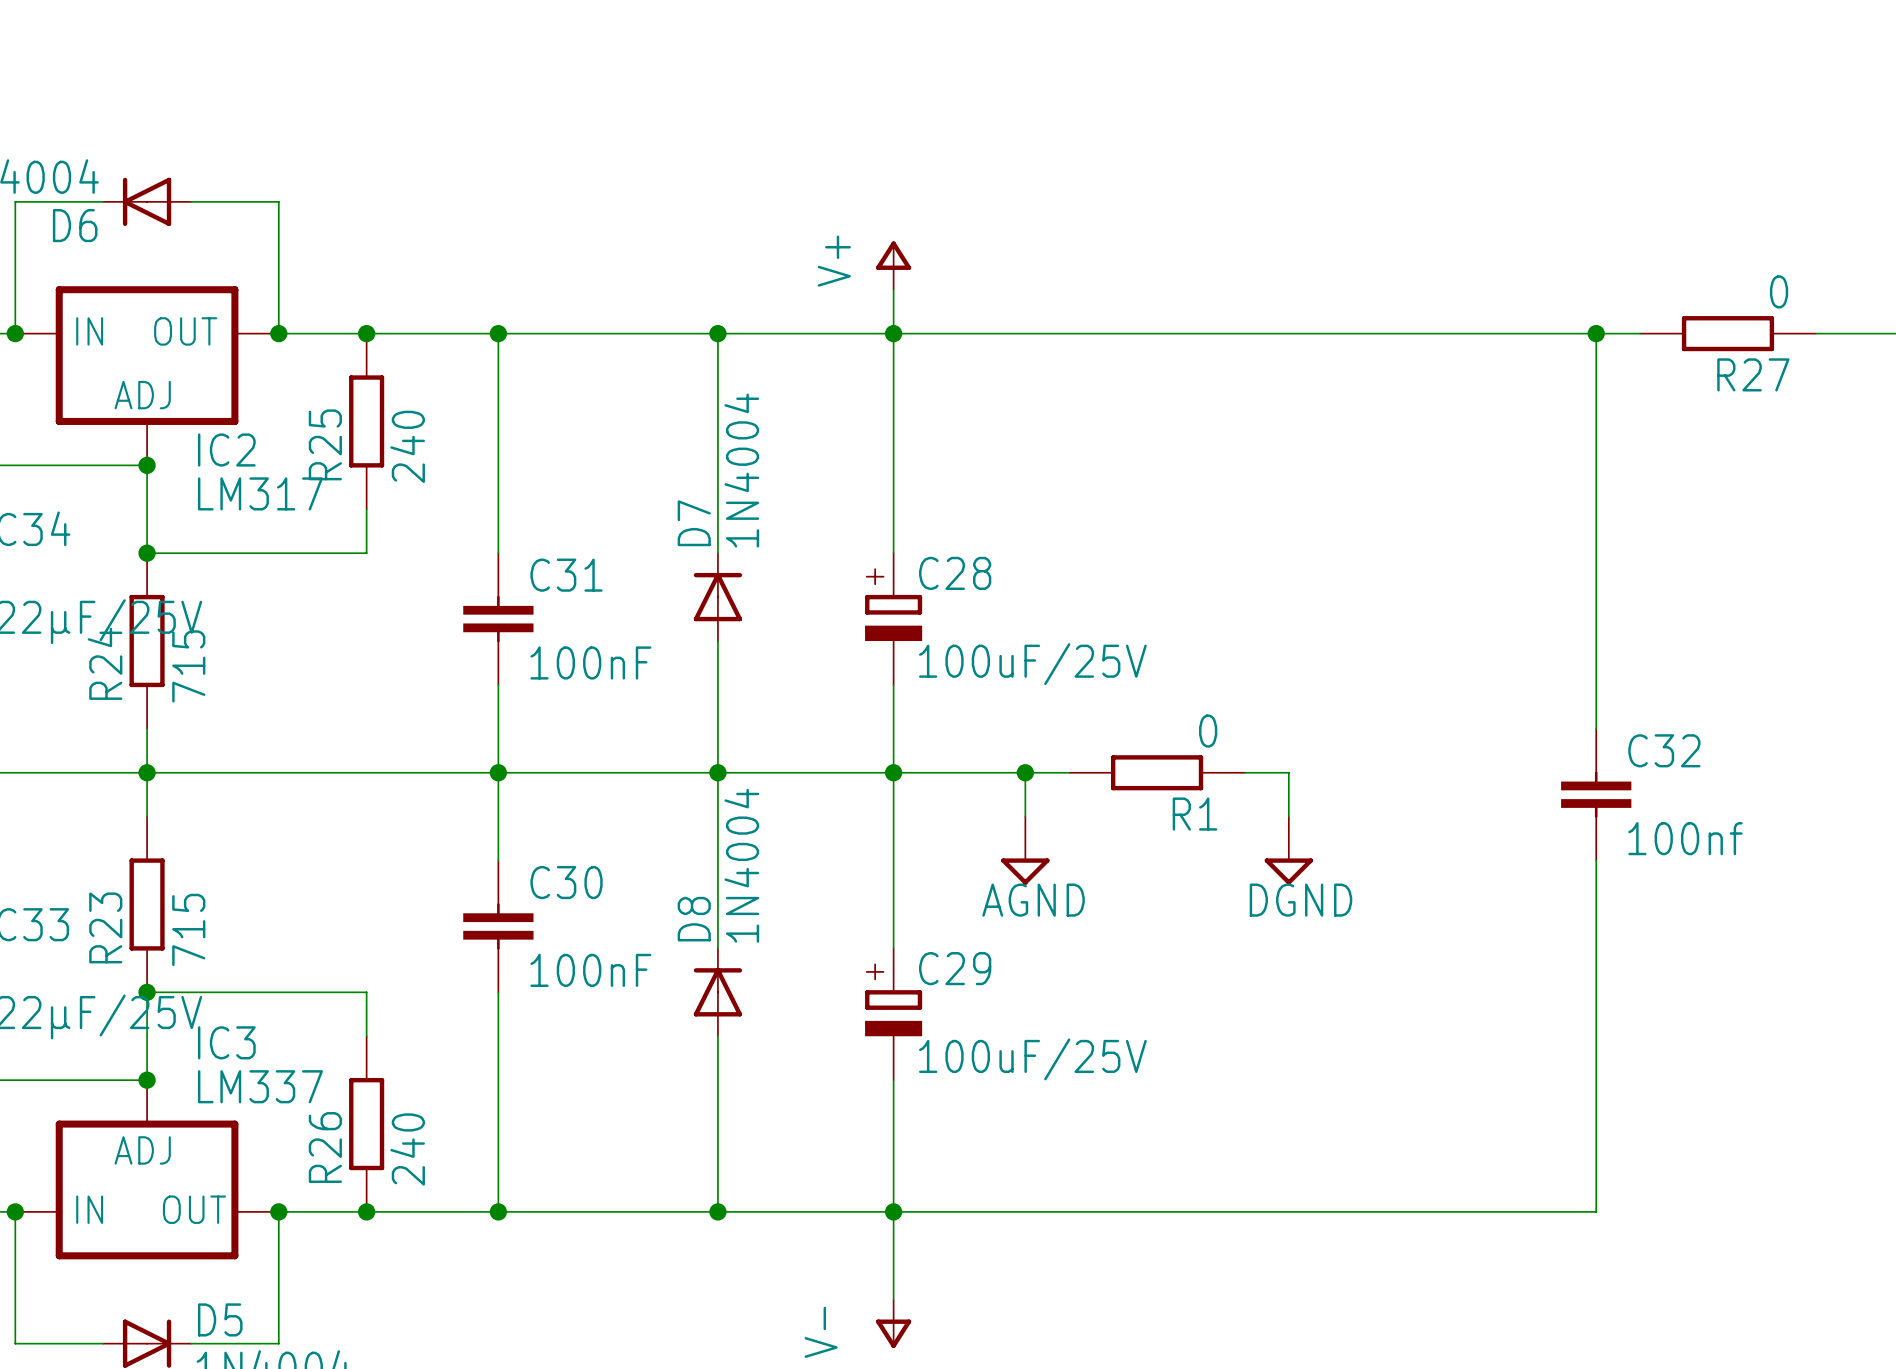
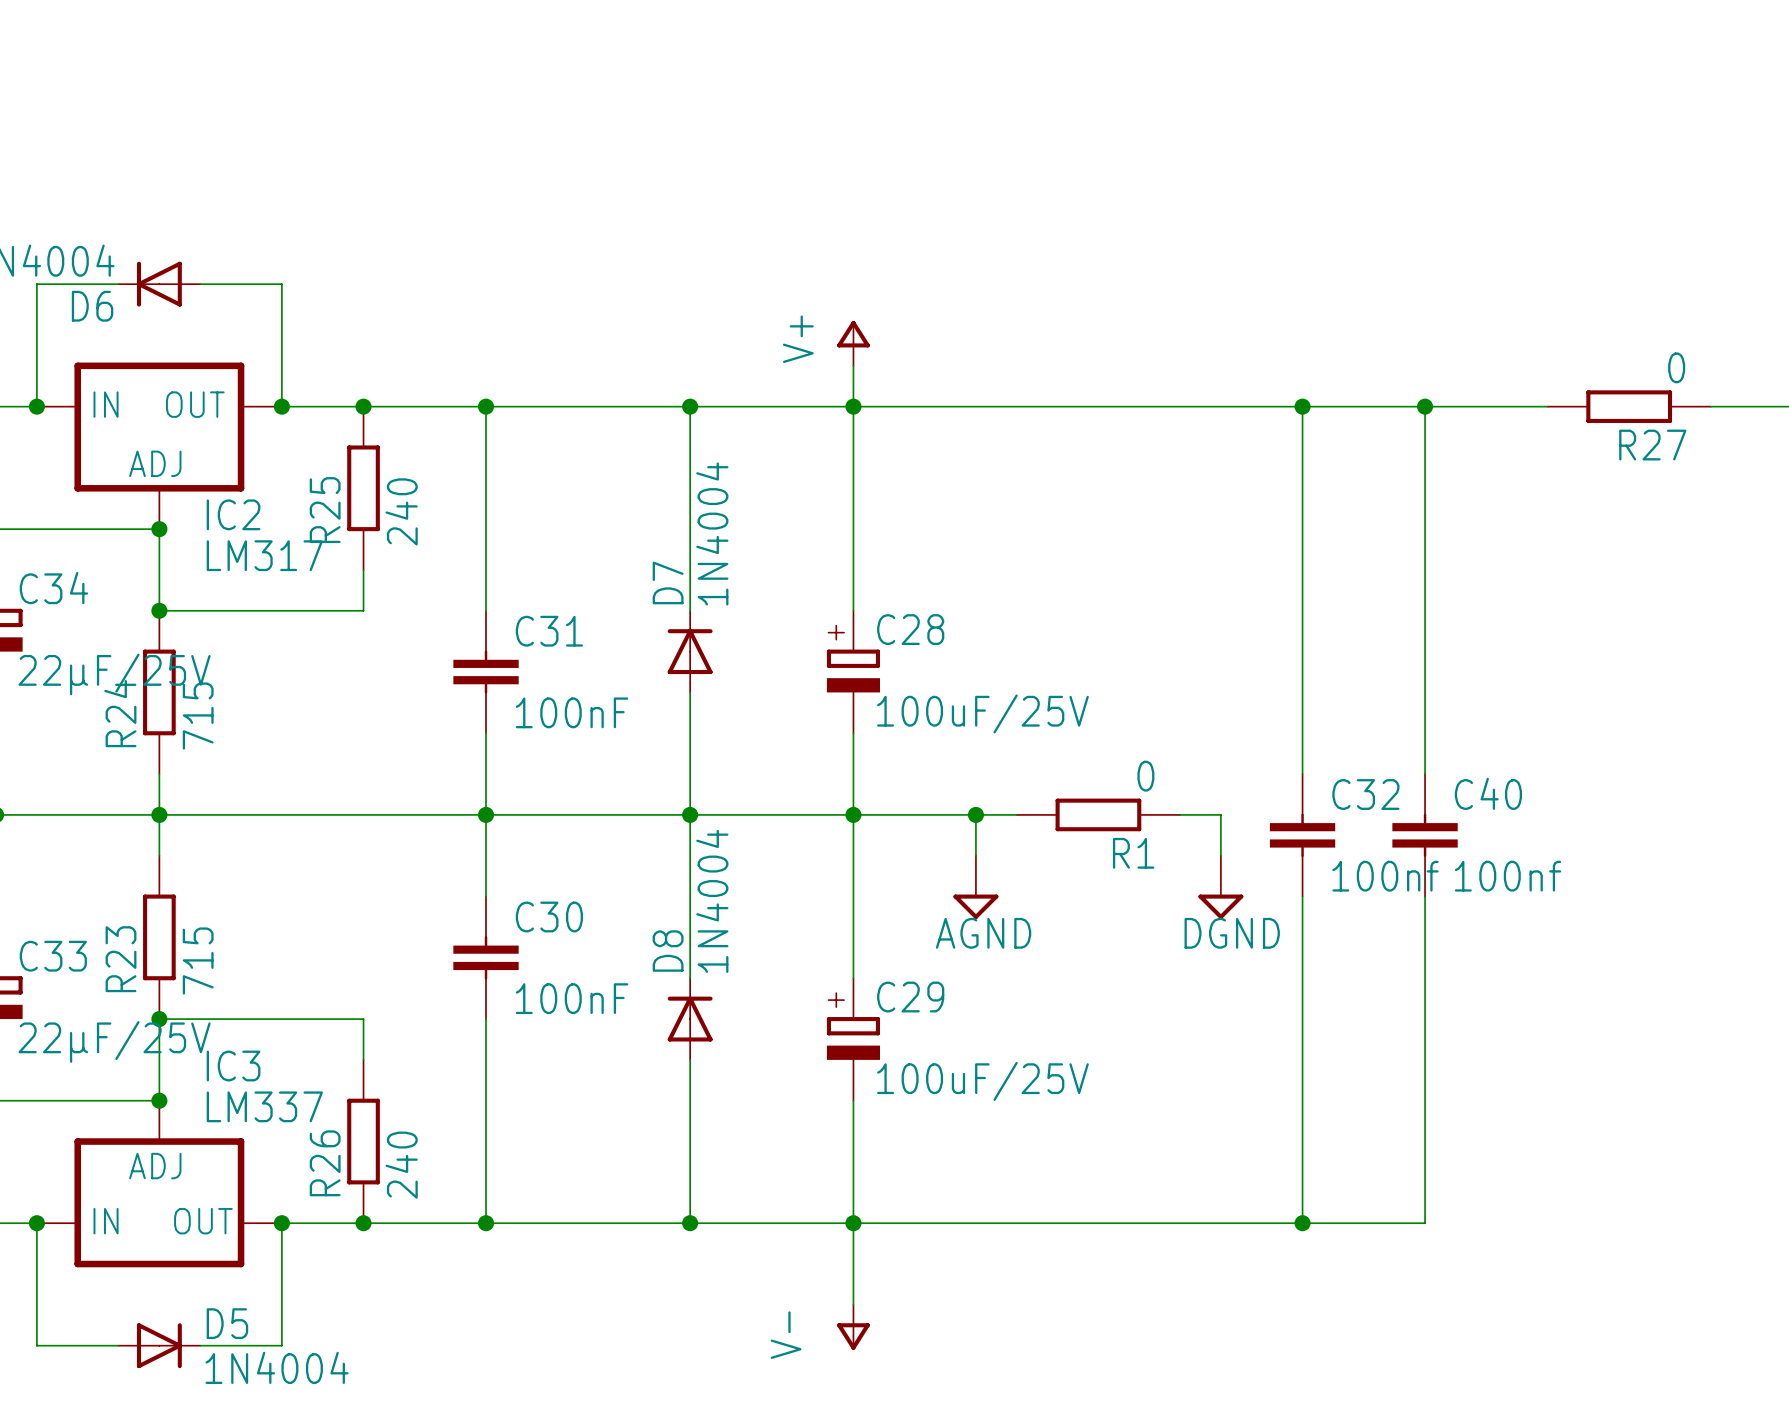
wire: none -> (1302, 406) (1302, 774)
junction: none -> (1302, 406)
wire: (1596, 333) (1596, 728) -> (1425, 406) (1425, 774)
junction position: (1596, 333) -> (1425, 406)
C40: none -> 100nf (1425, 835)
C32 position: (1596, 794) -> (1302, 835)
wire: none -> (1302, 896) (1302, 1223)
wire: (1596, 860) (1596, 1211) (1508, 1211) -> (1425, 896) (1425, 1223)
junction: none -> (1302, 1223)

